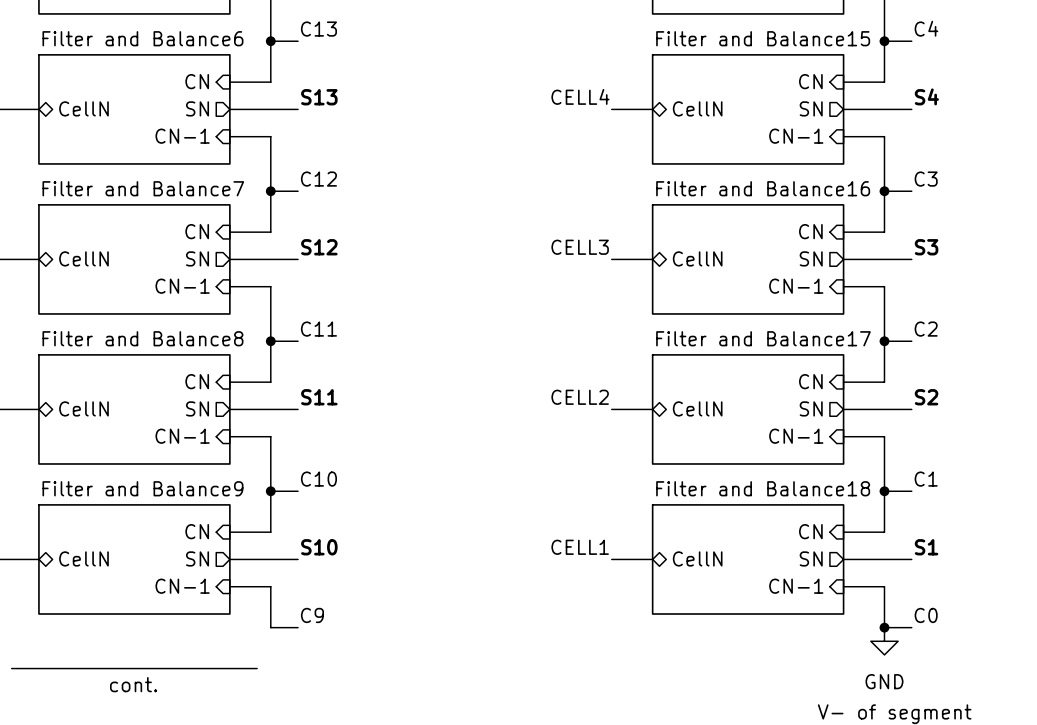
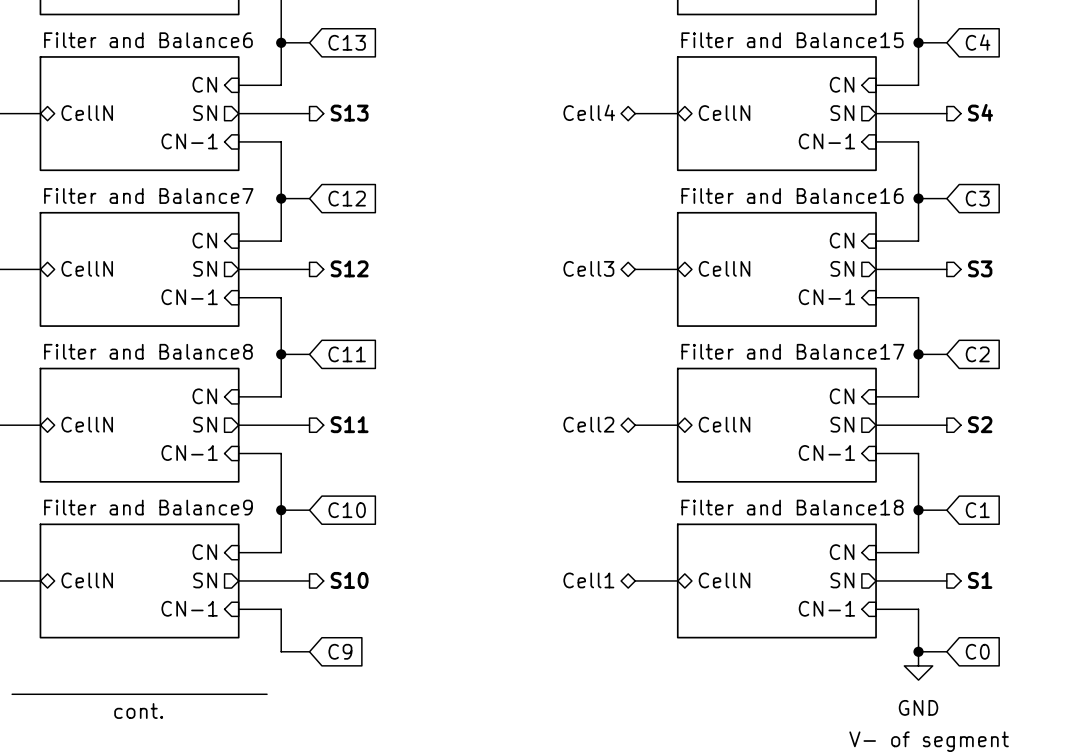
label: C4 (926, 28) -> none
label: C13 (318, 29) -> none
global label: none -> C4 (978, 42)
global label: none -> C13 (347, 42)
label: CELL4 (580, 96) -> none
label: S4 (926, 96) -> none
label: S13 (319, 97) -> none
hierarchical label: none -> S13 (349, 113)
hierarchical label: none -> Cell4 (589, 112)
hierarchical label: none -> S4 (980, 112)
label: C12 (318, 179) -> none
label: C3 (926, 179) -> none
global label: none -> C12 (347, 198)
global label: none -> C3 (977, 198)
label: S12 (319, 247) -> none
label: CELL3 (580, 247) -> none
label: S3 (926, 247) -> none
hierarchical label: none -> S12 (349, 268)
hierarchical label: none -> Cell3 (588, 268)
hierarchical label: none -> S3 (980, 268)
label: C11 (318, 329) -> none
label: C2 (926, 329) -> none
global label: none -> C11 (347, 354)
global label: none -> C2 (977, 354)
label: S11 (319, 397) -> none
label: CELL2 (580, 397) -> none
label: S2 (926, 397) -> none
hierarchical label: none -> S11 (349, 424)
hierarchical label: none -> Cell2 (588, 424)
hierarchical label: none -> S2 (980, 424)
label: C10 (318, 479) -> none
label: C1 (926, 479) -> none
global label: none -> C10 (347, 510)
global label: none -> C1 (977, 510)
label: S10 (319, 547) -> none
label: CELL1 (580, 547) -> none
label: S1 (926, 547) -> none
hierarchical label: none -> S10 (349, 580)
hierarchical label: none -> Cell1 (588, 580)
hierarchical label: none -> S1 (980, 580)
label: C9 (312, 615) -> none
label: C0 (926, 615) -> none
global label: none -> C9 (340, 651)
global label: none -> C0 (977, 651)

